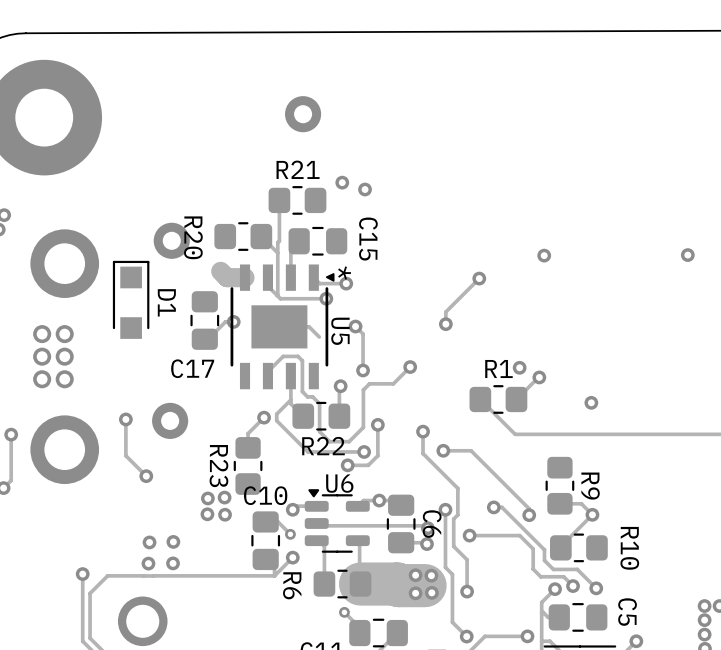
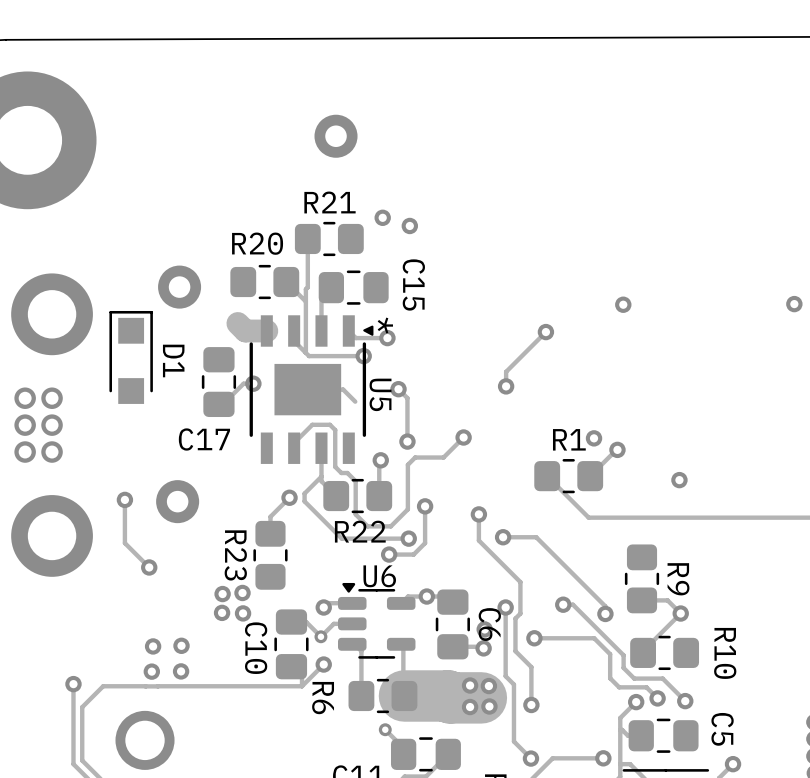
R20 name rotation: 0° (193, 237) -> 90° counterclockwise (257, 243)
C10 name rotation: 0° (265, 495) -> 90° clockwise (256, 648)
track: none -> (352, 623) (333, 623) (320, 636)
track: (318, 523) (321, 525) (425, 525) (427, 528) -> none

